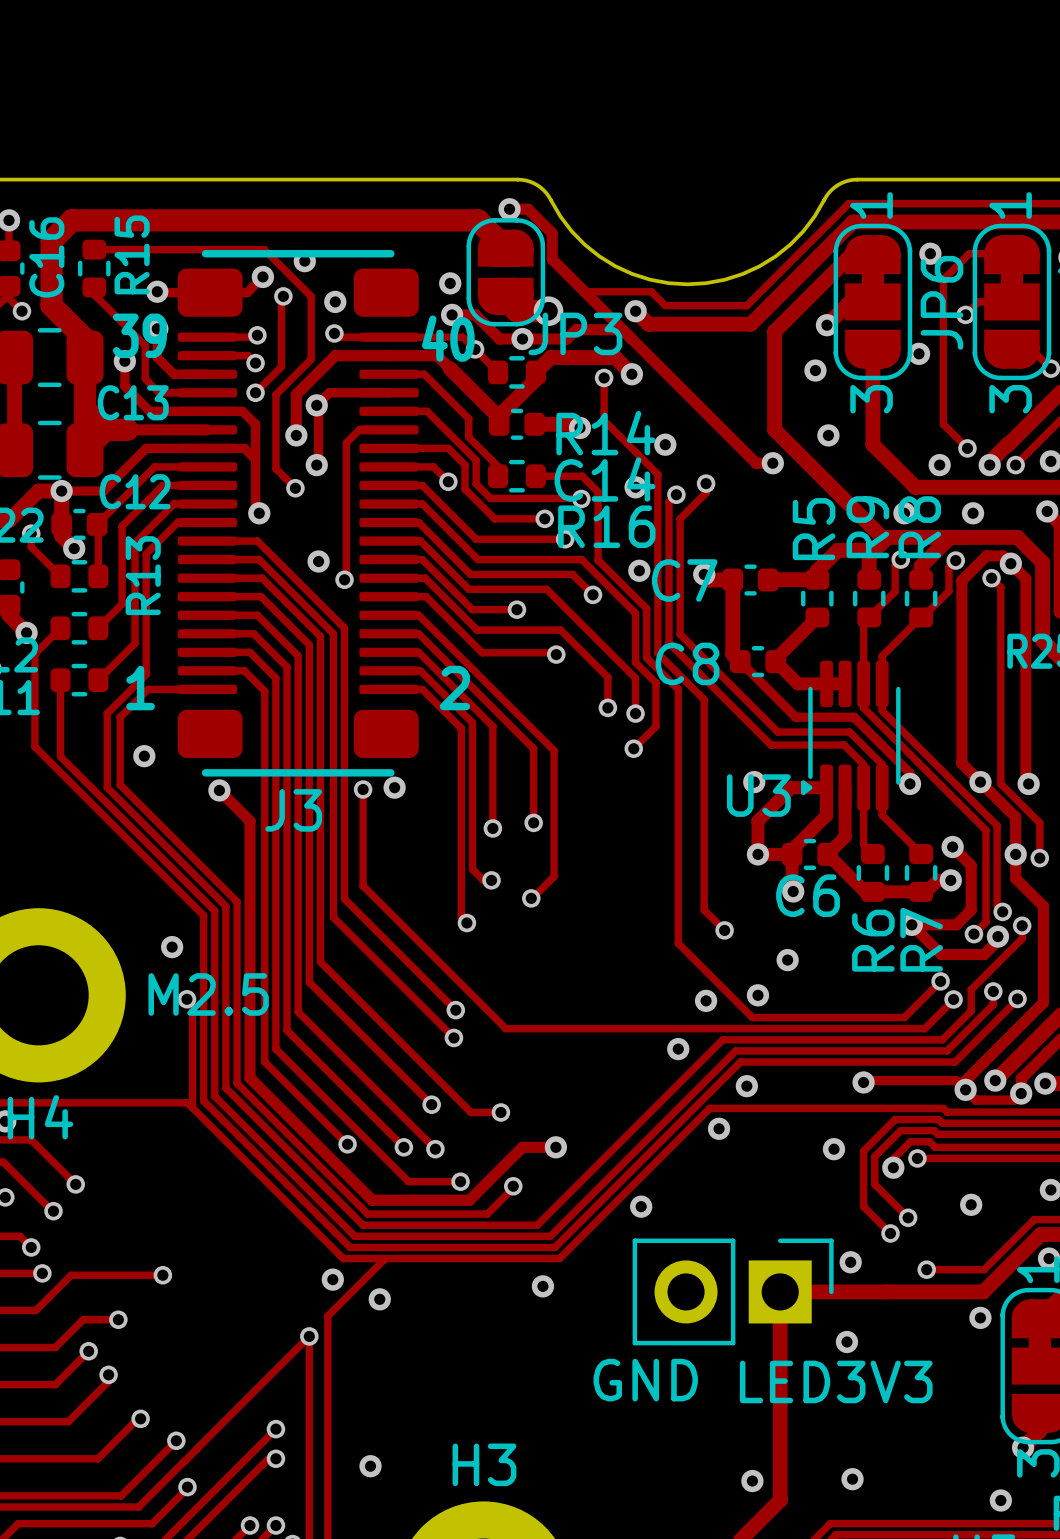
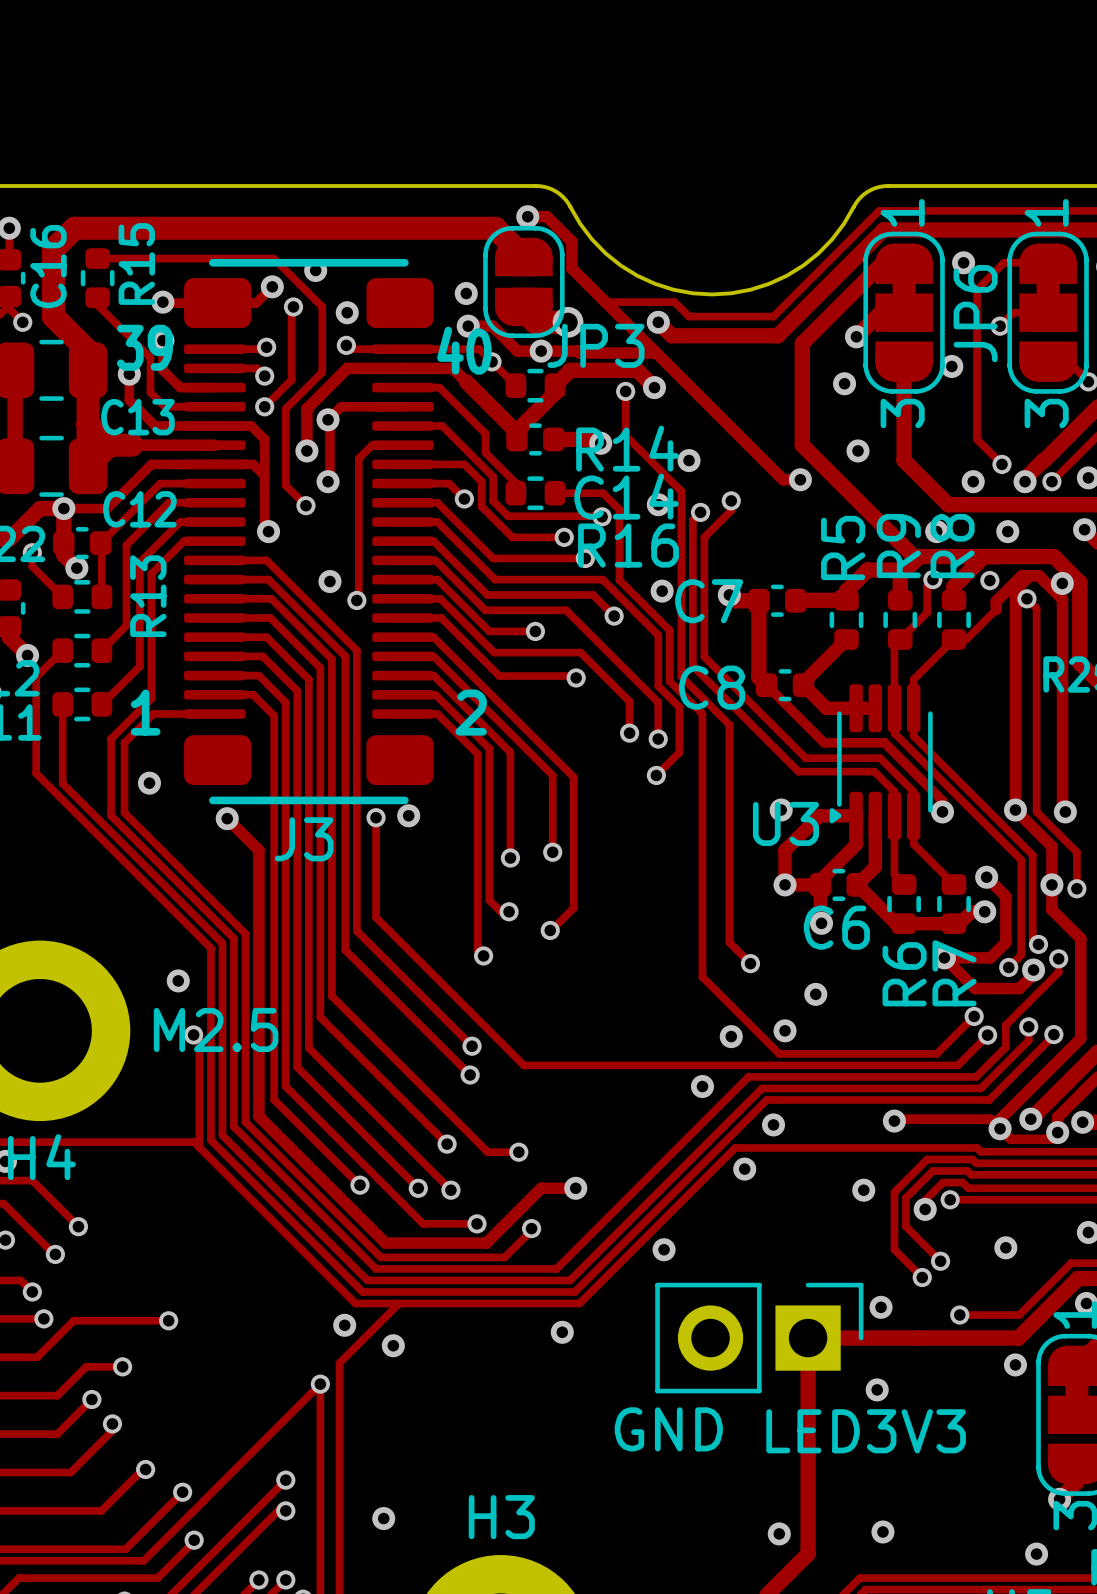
track: (622, 329) (576, 329) (567, 339) (557, 339) -> (654, 351) (652, 353) (579, 353) (577, 351)
track: (955, 560) (948, 567) (948, 591) (922, 617) -> (996, 609) (966, 639) (955, 639)
via position: (1010, 563) -> (1062, 583)
track: (961, 588) (961, 763) (980, 782) -> (1029, 575) (1015, 590) (1015, 810)

